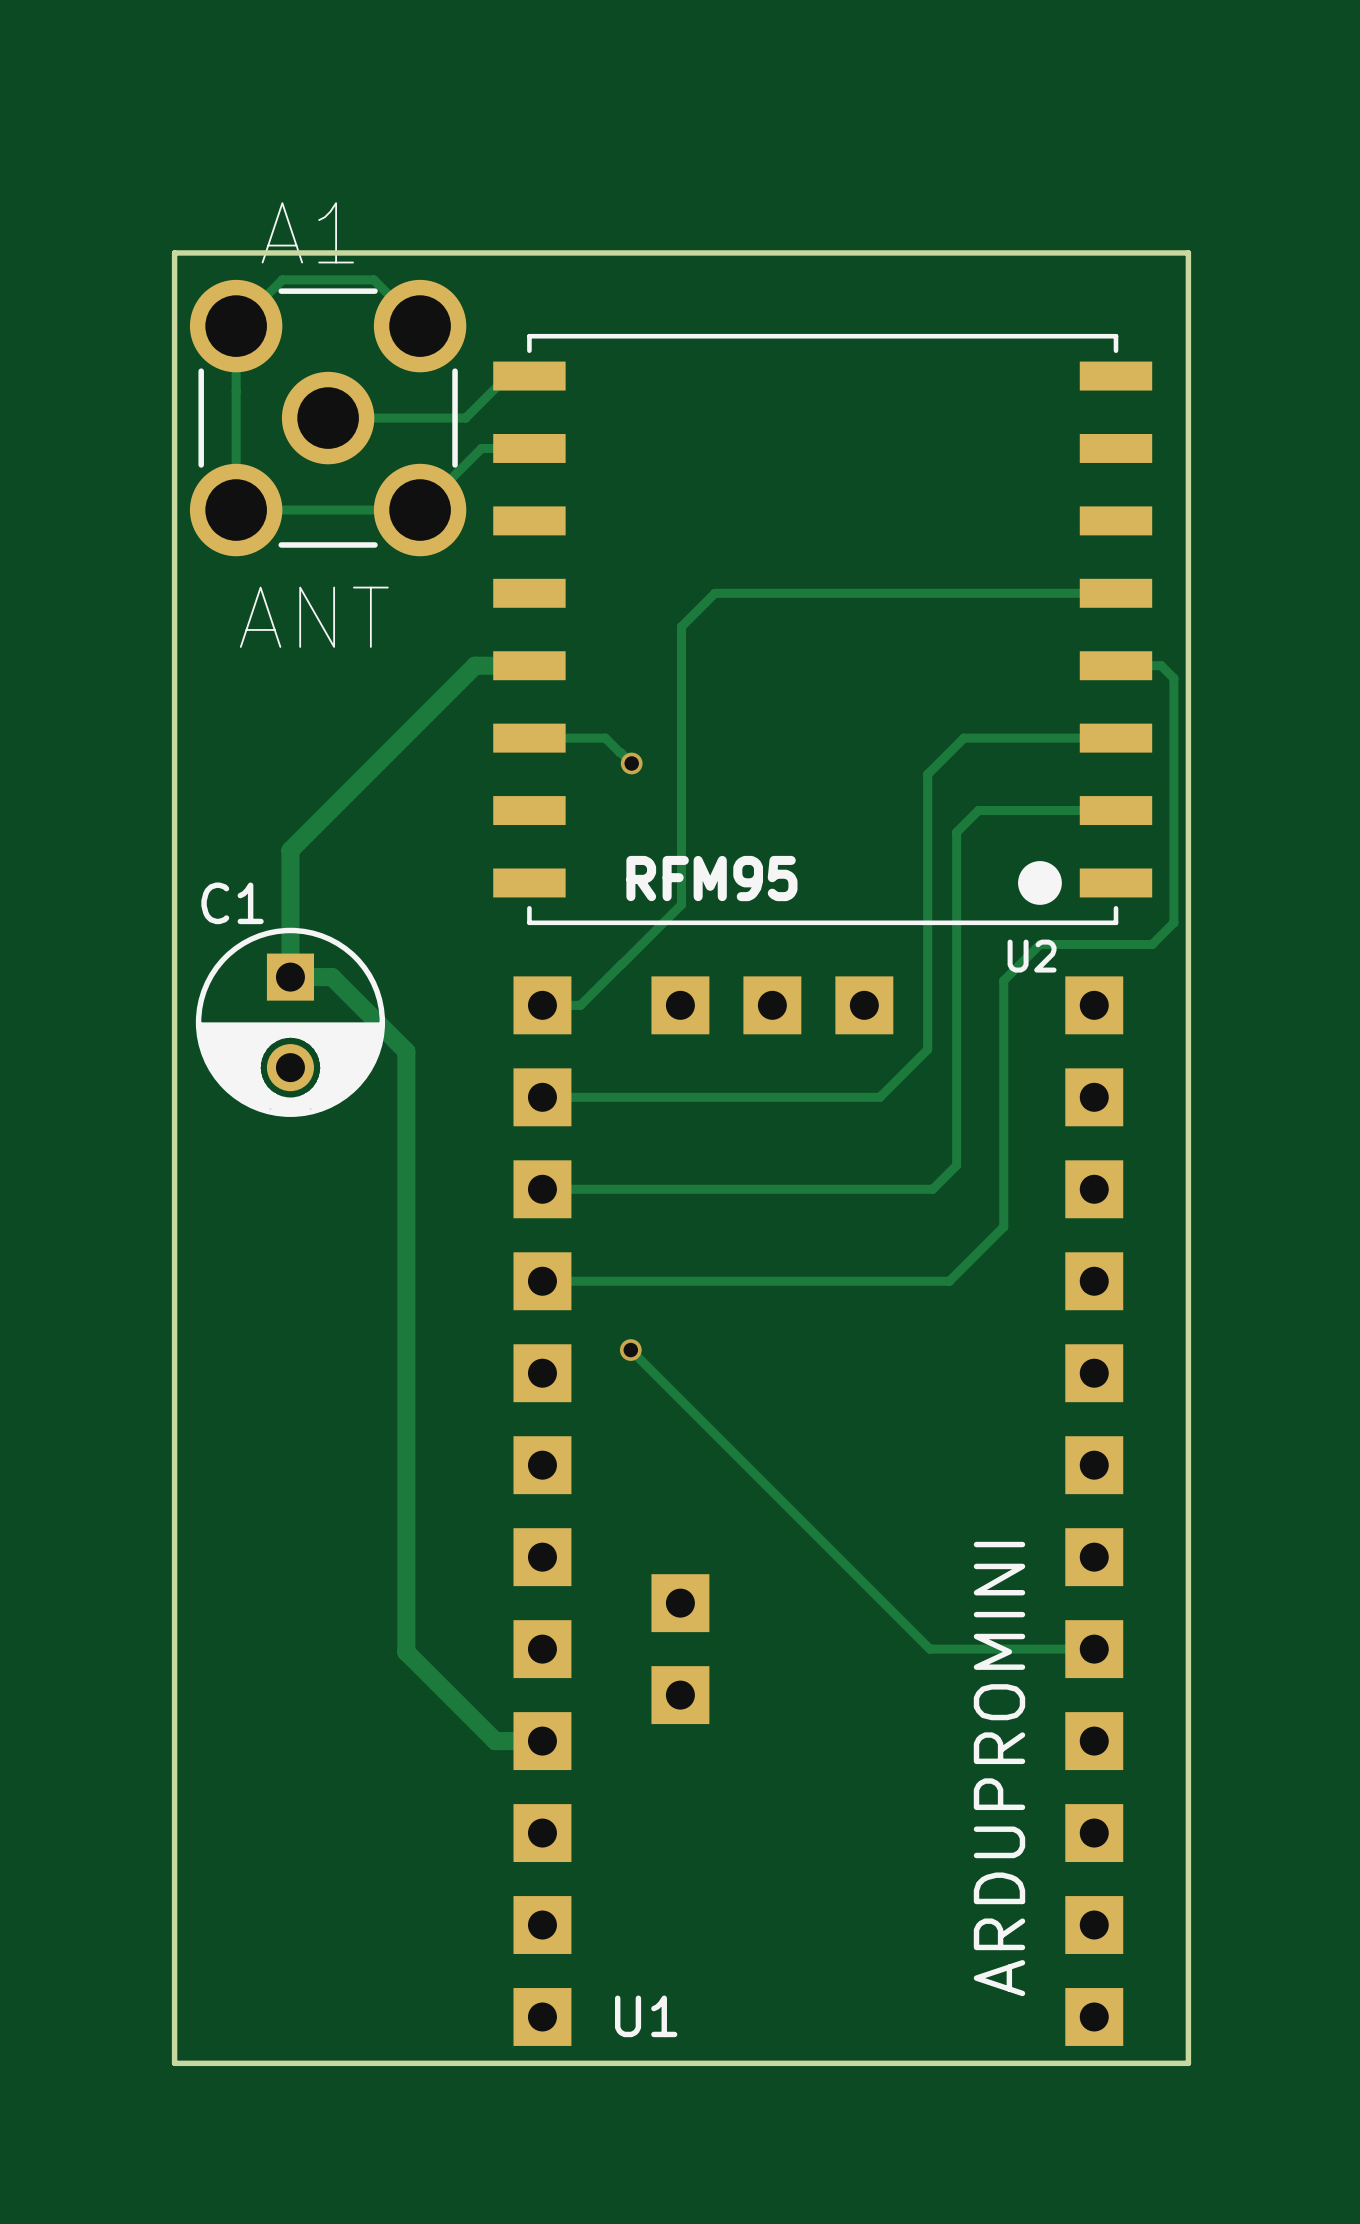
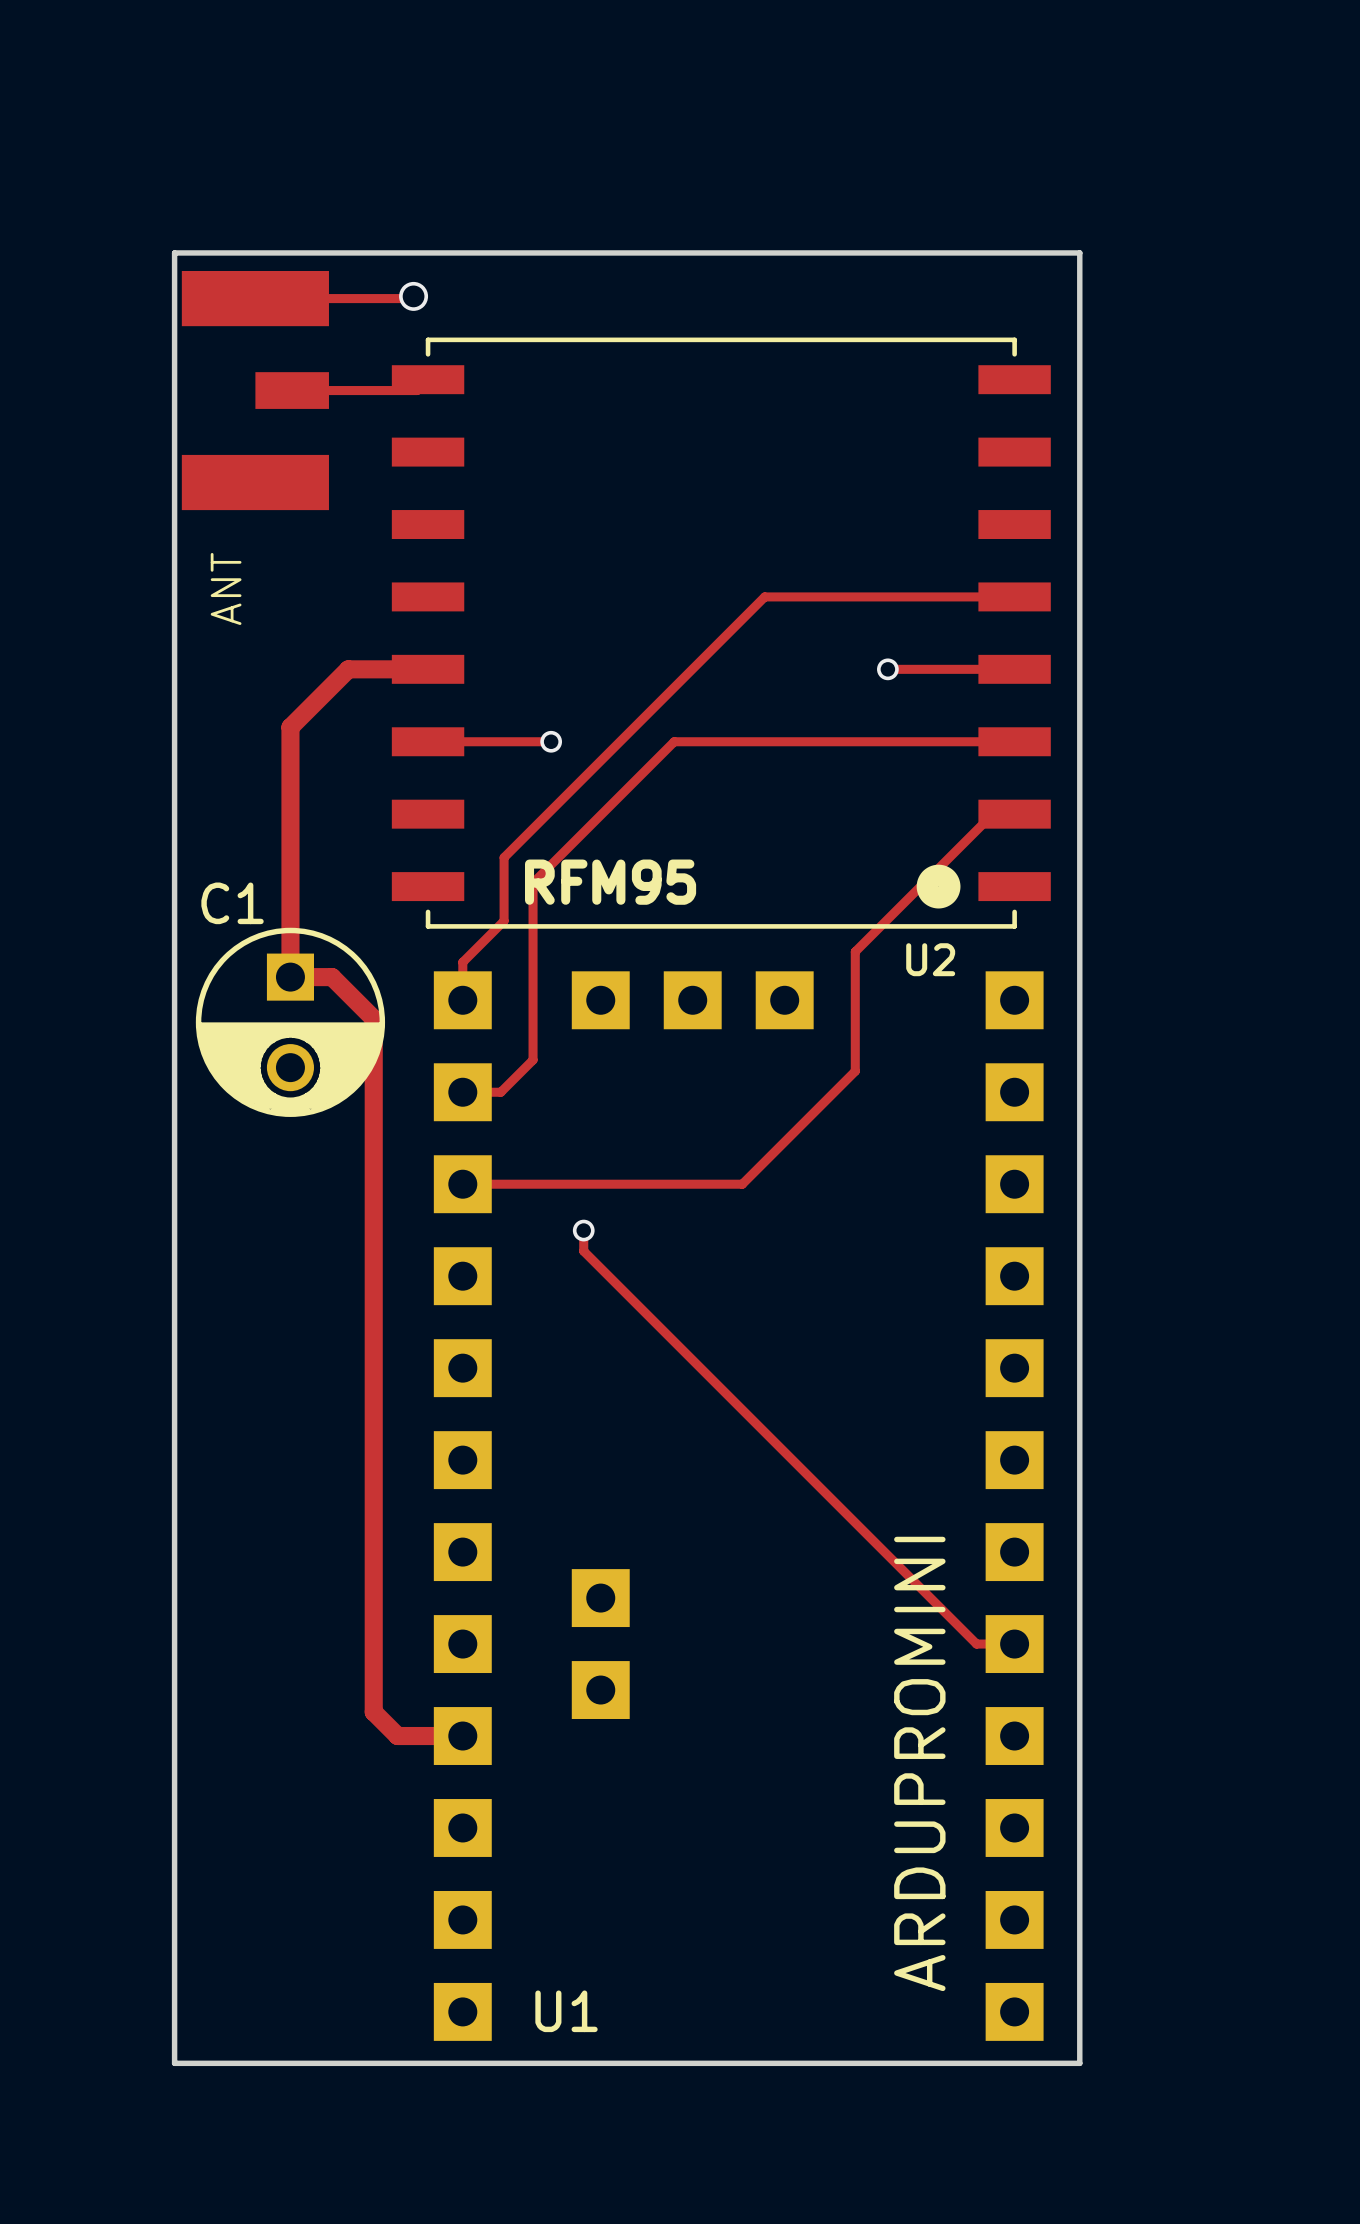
board edge: (1079, 252) (1188, 252) (1188, 2063) (1079, 2063) -> (1079, 252) (1079, 2063)
track: none -> (413, 296) (411, 298) (255, 298)
via: none -> (413, 296)
track: (420, 326) (373, 279) (282, 279) (236, 326) (236, 510) (420, 510) (481, 448) (529, 448) -> none
track: (529, 376) (507, 376) (465, 418) (328, 418) -> none
track: none -> (428, 379) (417, 390) (292, 390)
part: none -> ANT (255, 390)
A1: ANT (328, 418) -> none
track: (1115, 593) (714, 593) (681, 626) (681, 904) (621, 964) -> none
track: none -> (1014, 596) (764, 596) (504, 857) (504, 920) (462, 962) (462, 1000)
U2 position: (822, 629) -> (721, 633)
track: (529, 665) (475, 665) (290, 850) -> (428, 669) (348, 669) (290, 727) (290, 850)
track: (1115, 665) (1161, 665) (1173, 678) (1173, 922) (1152, 944) (1039, 944) (1003, 980) (1003, 1226) (949, 1281) (542, 1281) -> none
track: none -> (887, 669) (1014, 669)
via: none -> (887, 669)
track: (529, 738) (605, 738) (631, 763) -> none
track: (1115, 738) (963, 738) (927, 774) (927, 1049) (879, 1097) (542, 1097) -> none
track: none -> (428, 741) (551, 741)
track: none -> (1014, 741) (674, 741) (533, 882) (533, 1060) (500, 1092) (462, 1092)
via position: (631, 763) -> (551, 741)
track: (1115, 810) (978, 810) (956, 832) (956, 1165) (932, 1189) (542, 1189) -> none
track: none -> (1014, 814) (992, 814) (855, 951) (855, 1071) (742, 1184) (462, 1184)
track: (621, 964) (580, 1005) (542, 1005) -> none
track: (373, 1018) (406, 1051) (406, 1652) (495, 1741) (542, 1741) -> (373, 1018) (373, 1712) (397, 1736) (462, 1736)
track: none -> (583, 1230) (583, 1251) (976, 1644) (1014, 1644)
track: (630, 1350) (929, 1649) (1094, 1649) -> none
via position: (630, 1350) -> (583, 1230)
U1 position: (818, 1511) -> (738, 1506)

